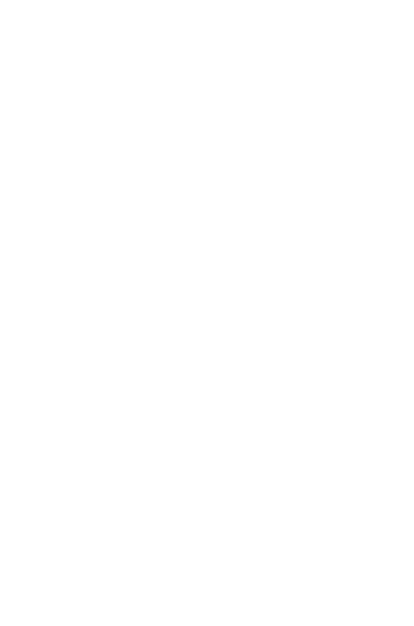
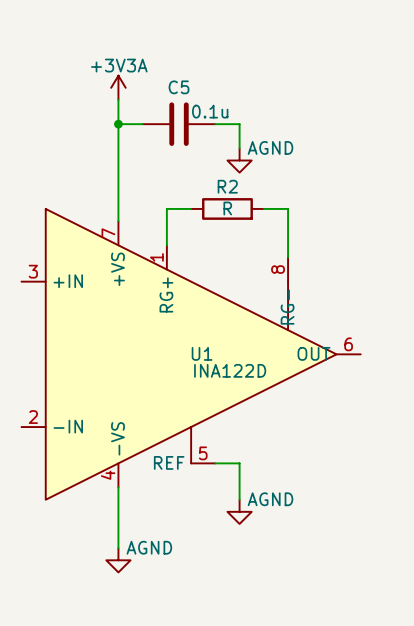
power symbol: none -> +3V3A (118, 87)
wire: none -> (118, 99) (118, 221)
wire: none -> (118, 124) (142, 124)
junction: none -> (118, 124)
C5: none -> 0.1u (179, 124)
wire: none -> (215, 124) (239, 124) (239, 148)
power symbol: none -> AGND (239, 160)
wire: none -> (191, 208) (166, 208) (166, 245)
R2: none -> R (227, 208)
wire: none -> (263, 208) (288, 208) (288, 257)
U1: none -> INA122D (191, 354)
wire: none -> (215, 463) (239, 463) (239, 499)
wire: none -> (118, 487) (118, 548)
power symbol: none -> AGND (239, 511)
power symbol: none -> AGND (118, 560)

